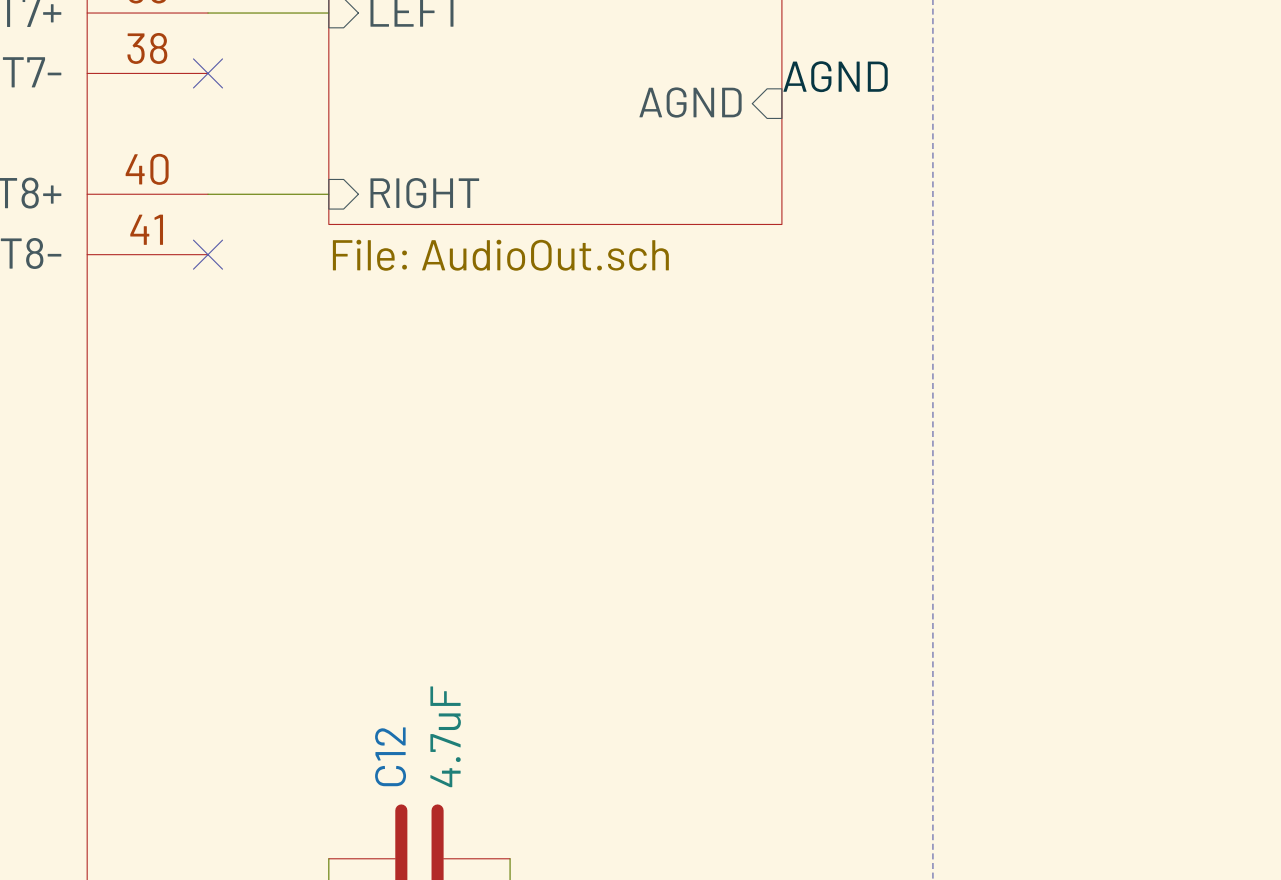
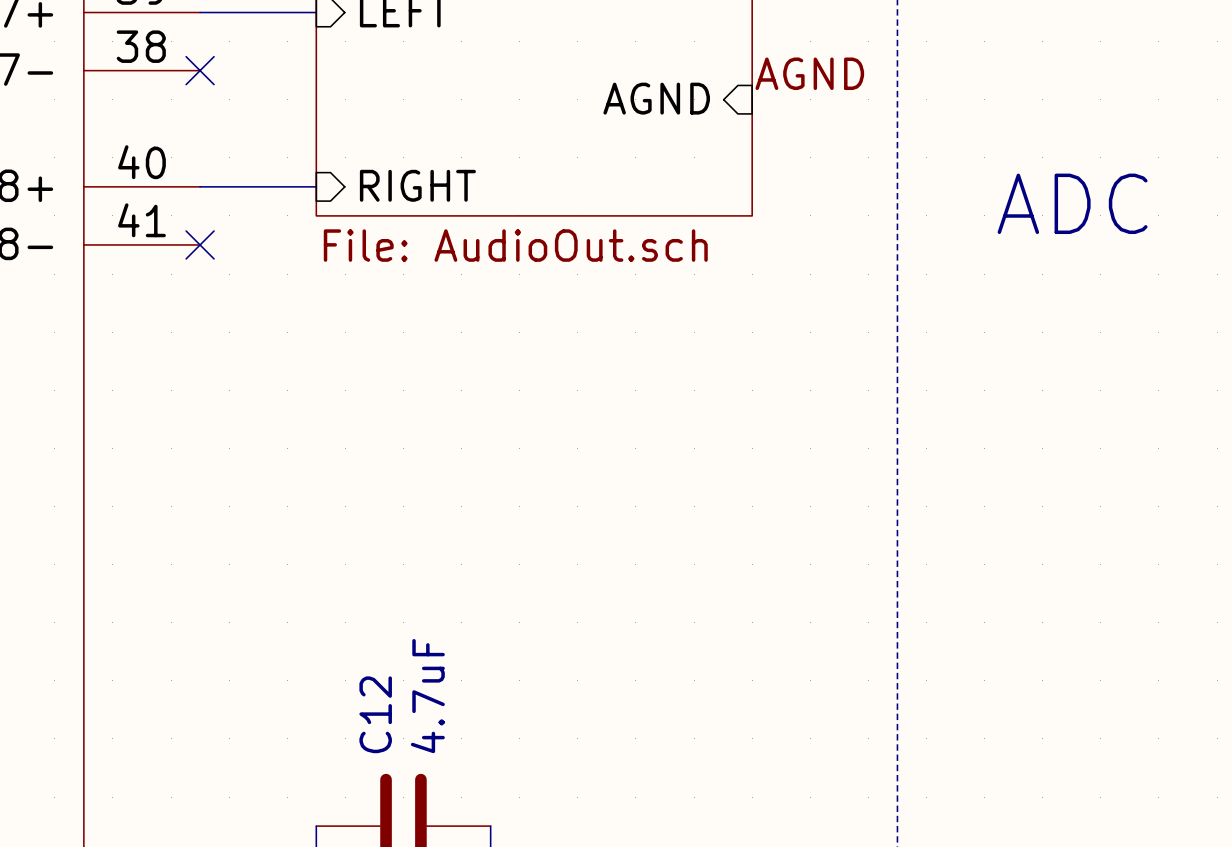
text: none -> ADC (1072, 203)

